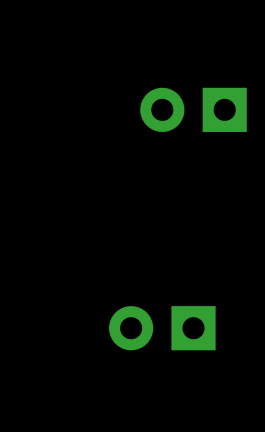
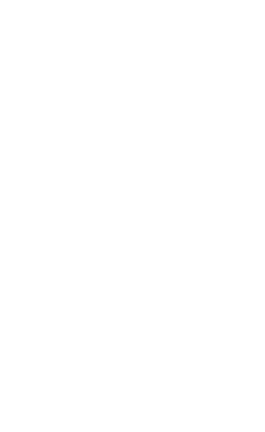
part: (193, 109) -> none
part: (162, 328) -> none

